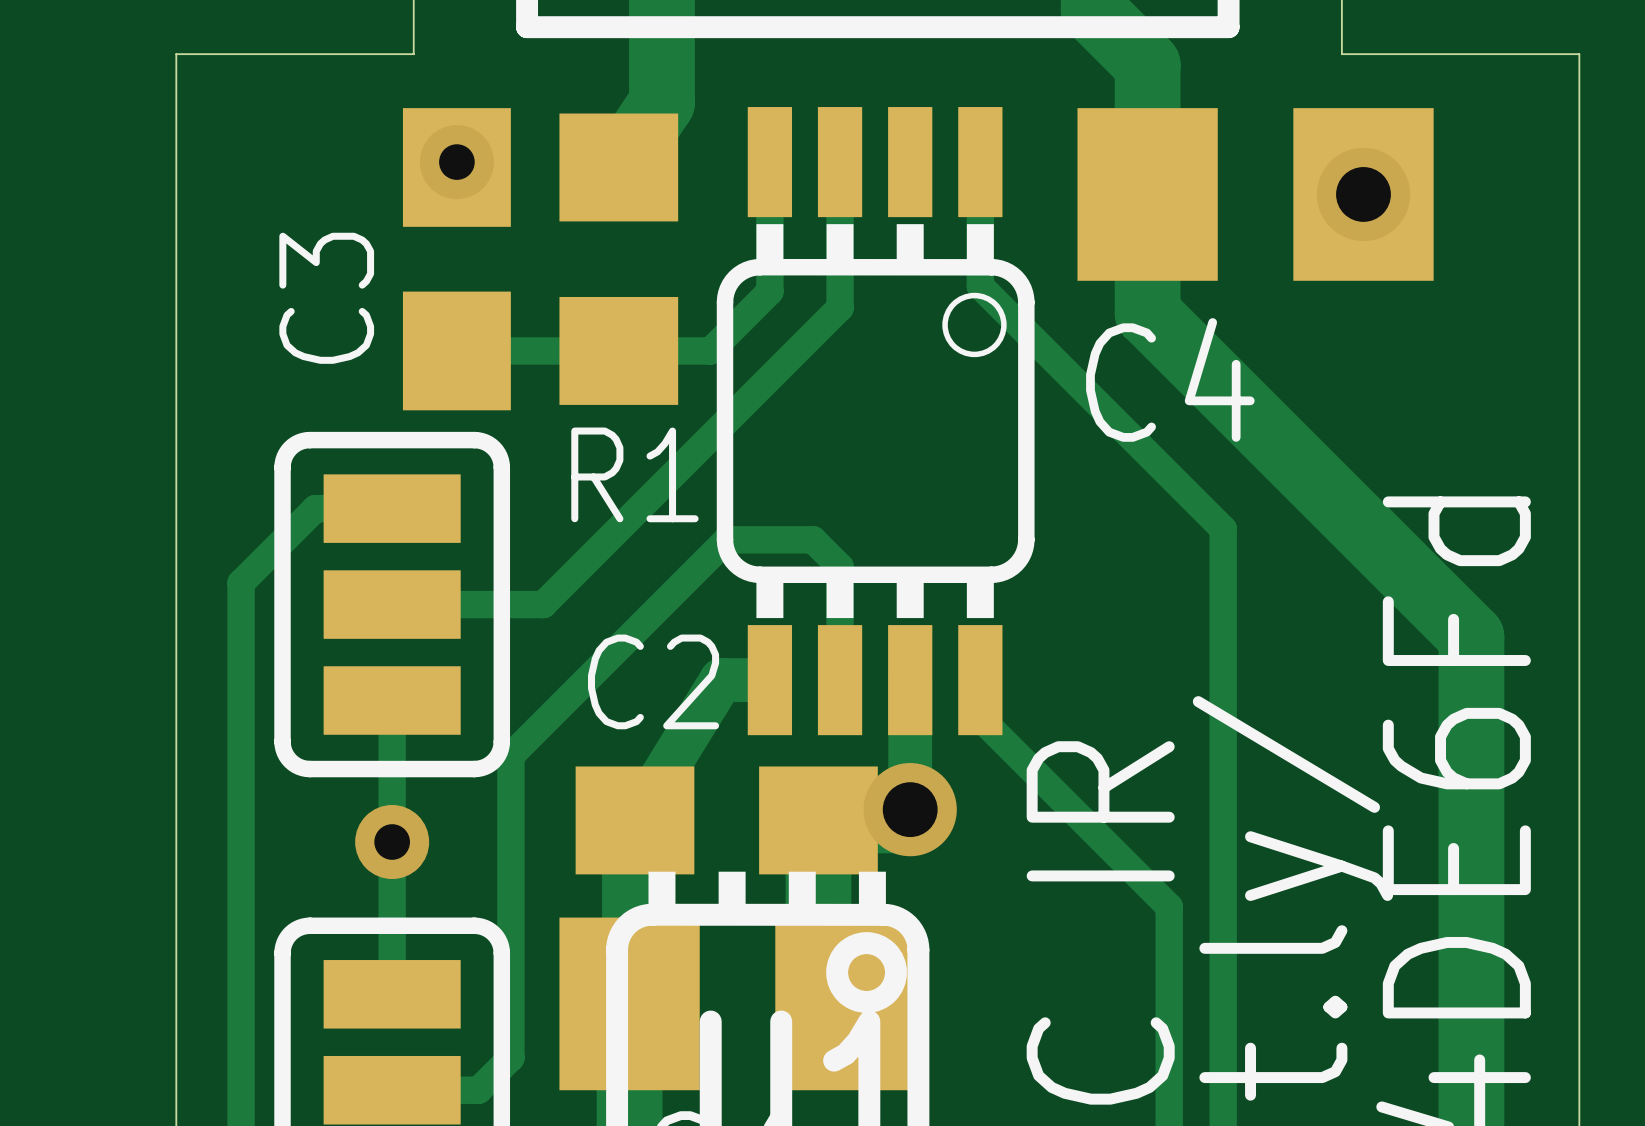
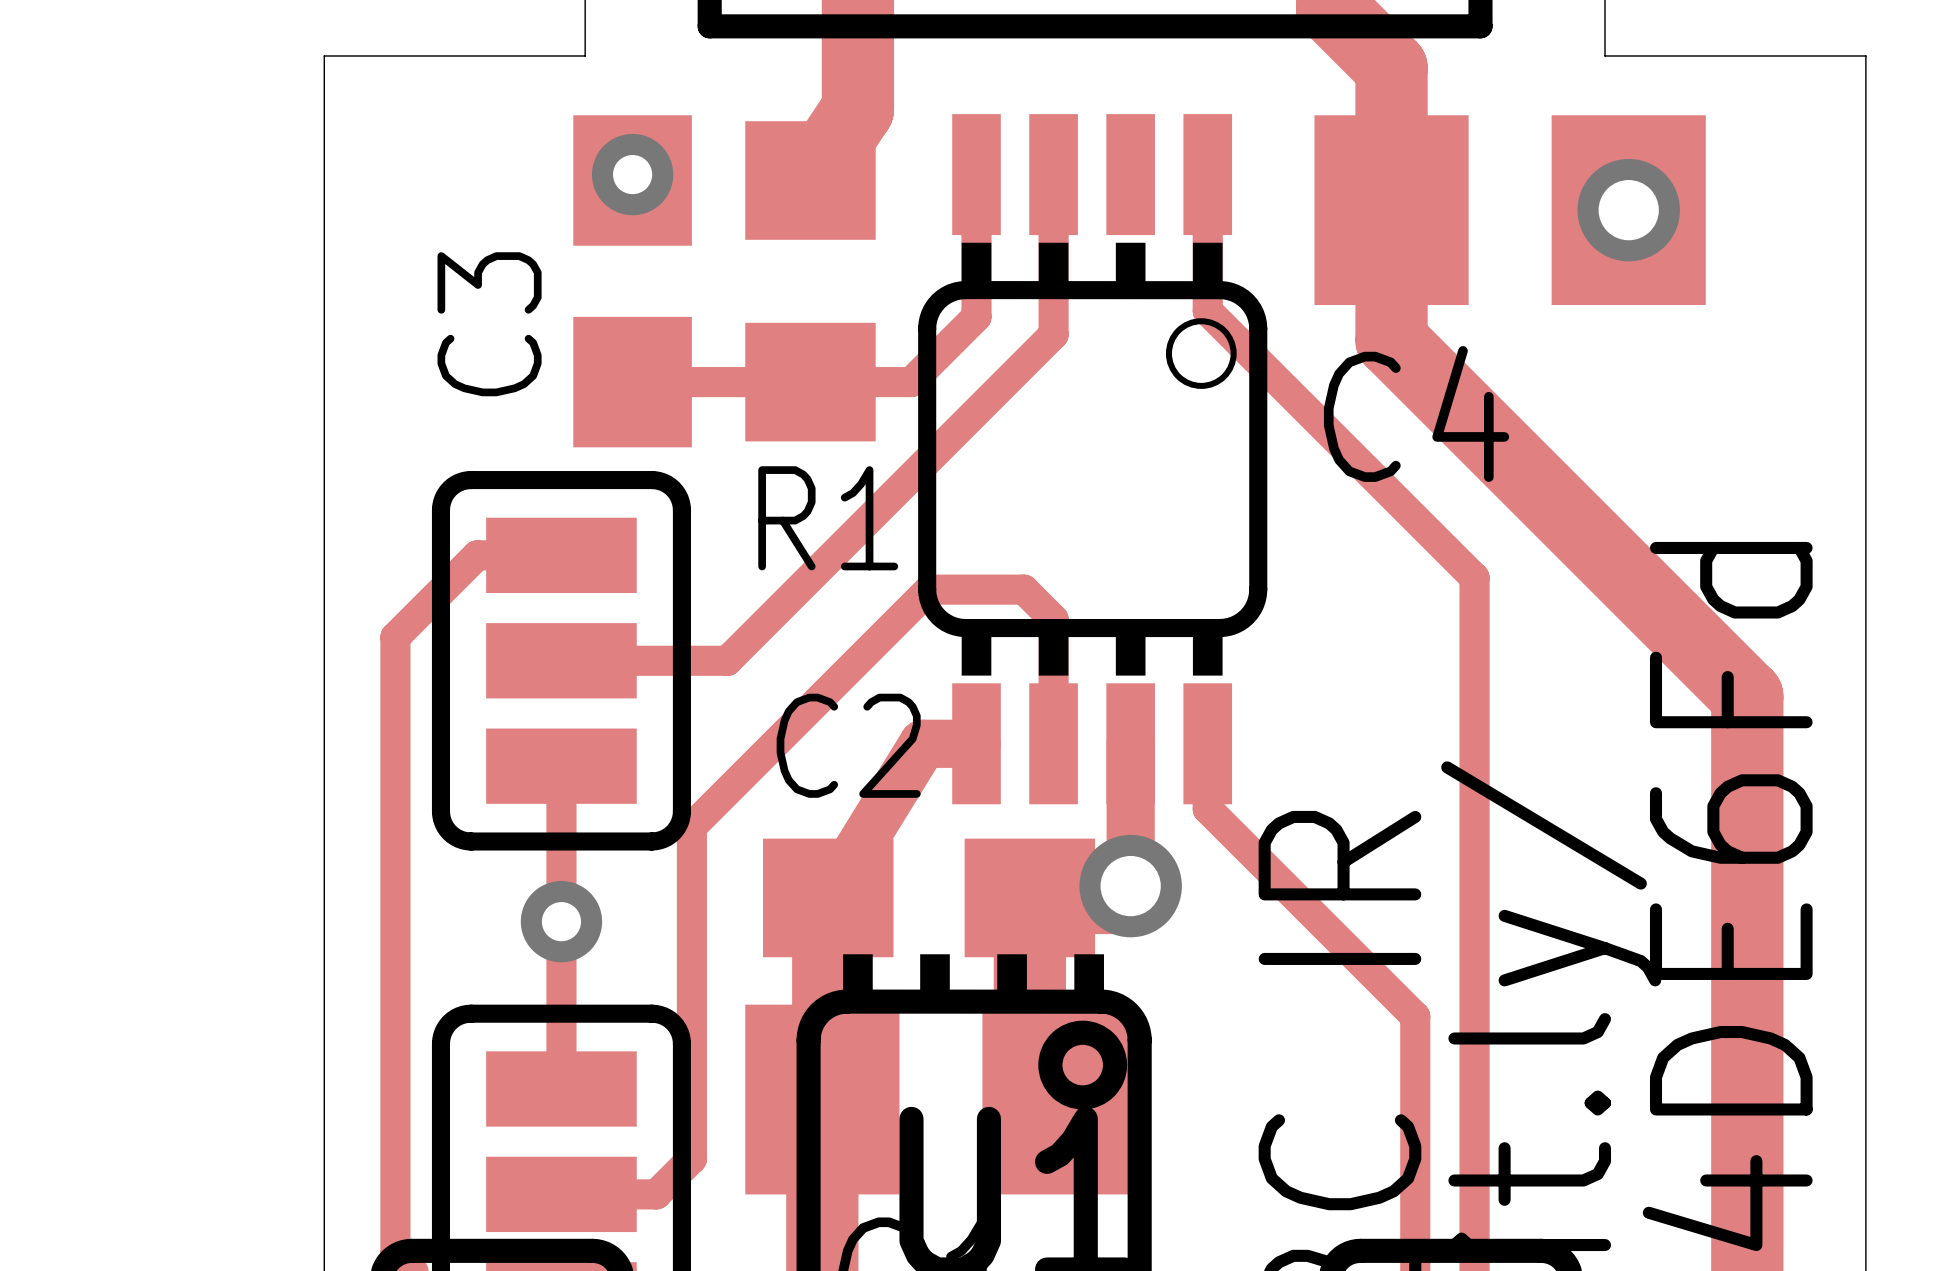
track: (980, 717) (1169, 906) (1169, 928) -> (1207, 785) (1207, 809) (1415, 1016)

